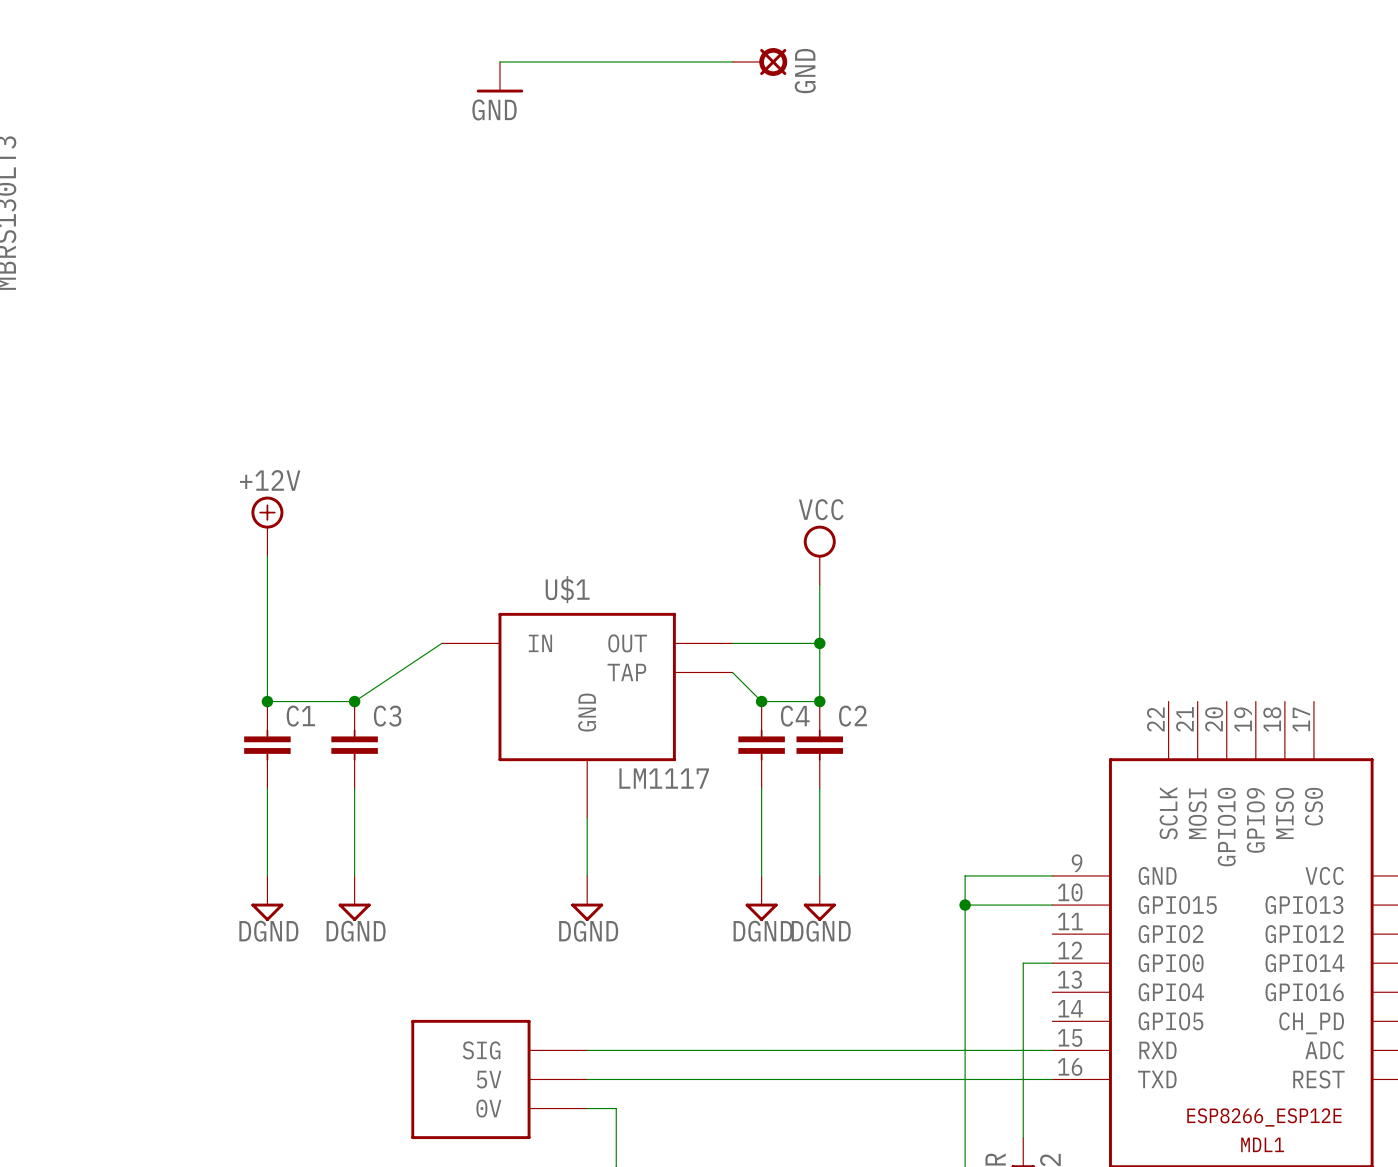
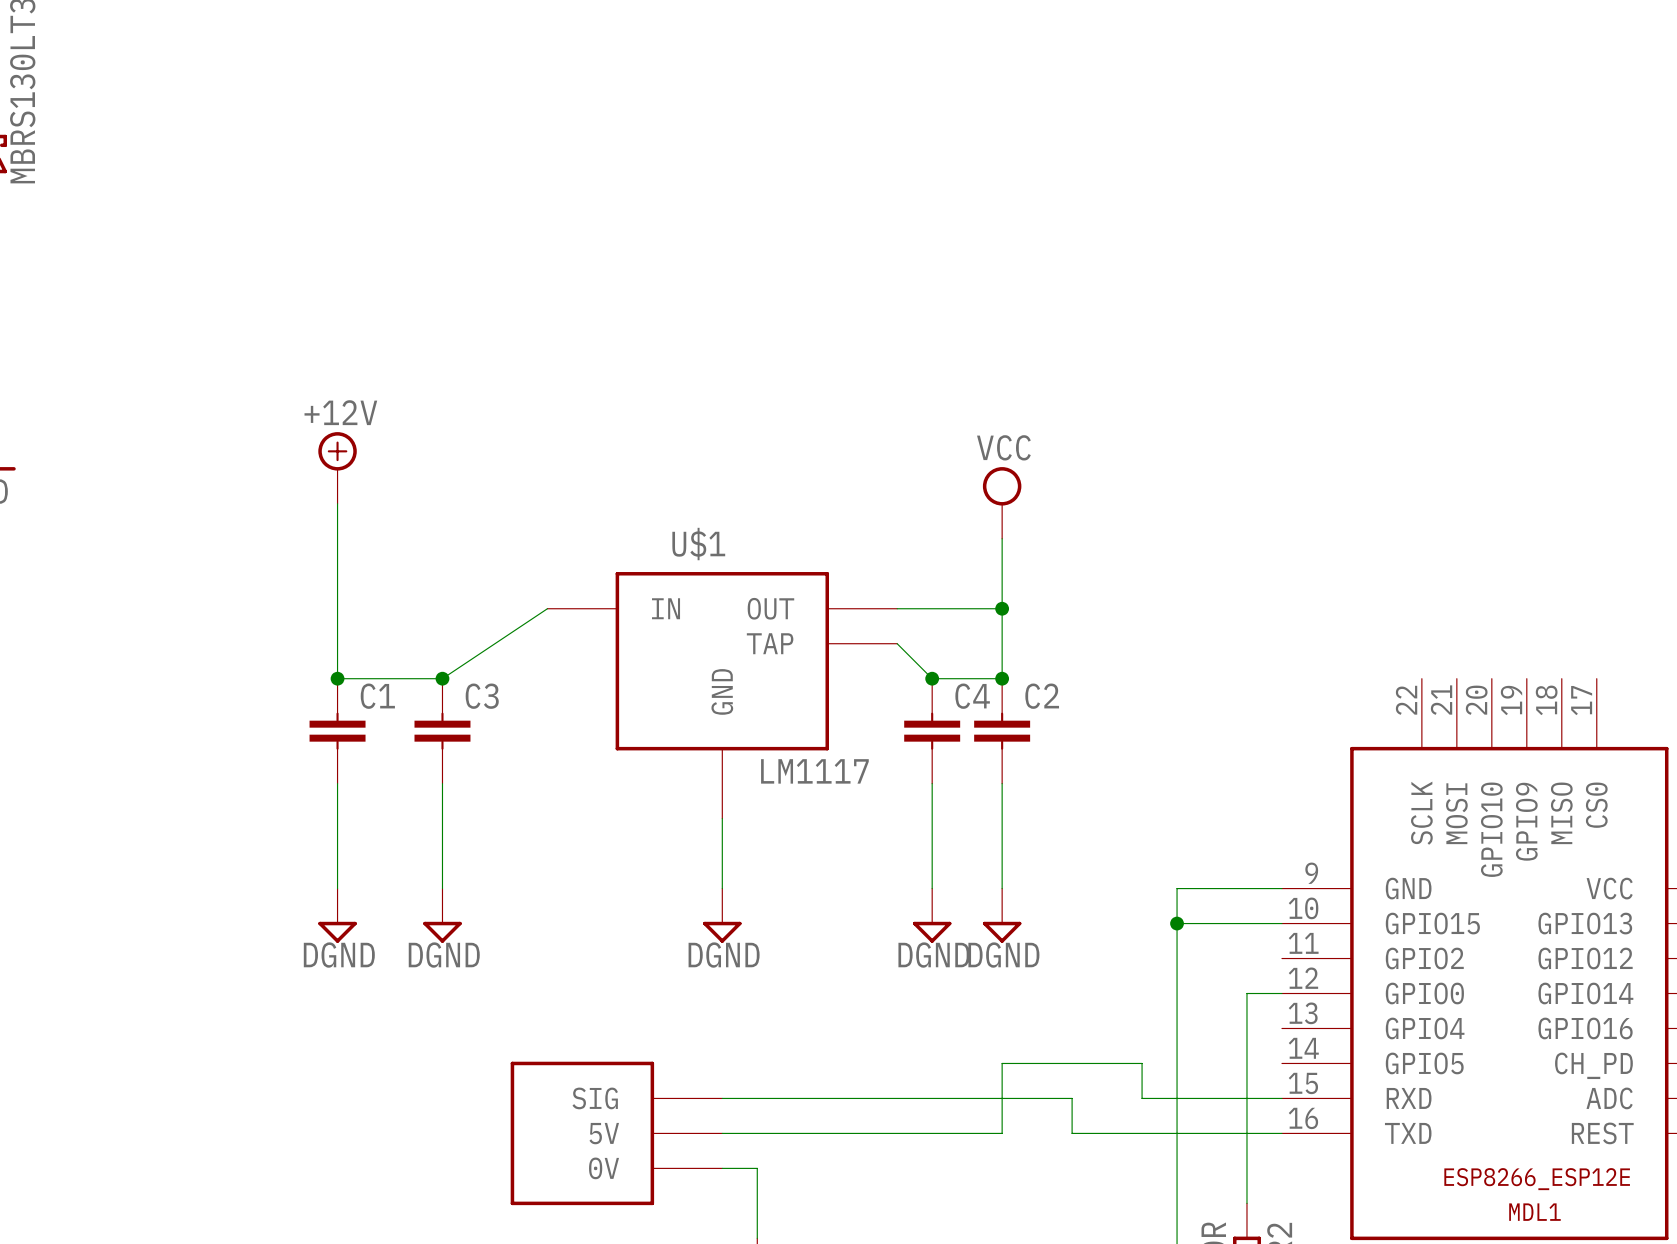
wire: (877, 1050) (936, 1050) -> (1072, 1098) (1072, 1133)
wire: (819, 1079) (877, 1079) -> (1002, 1133) (1002, 1063) (1142, 1063) (1142, 1098)

